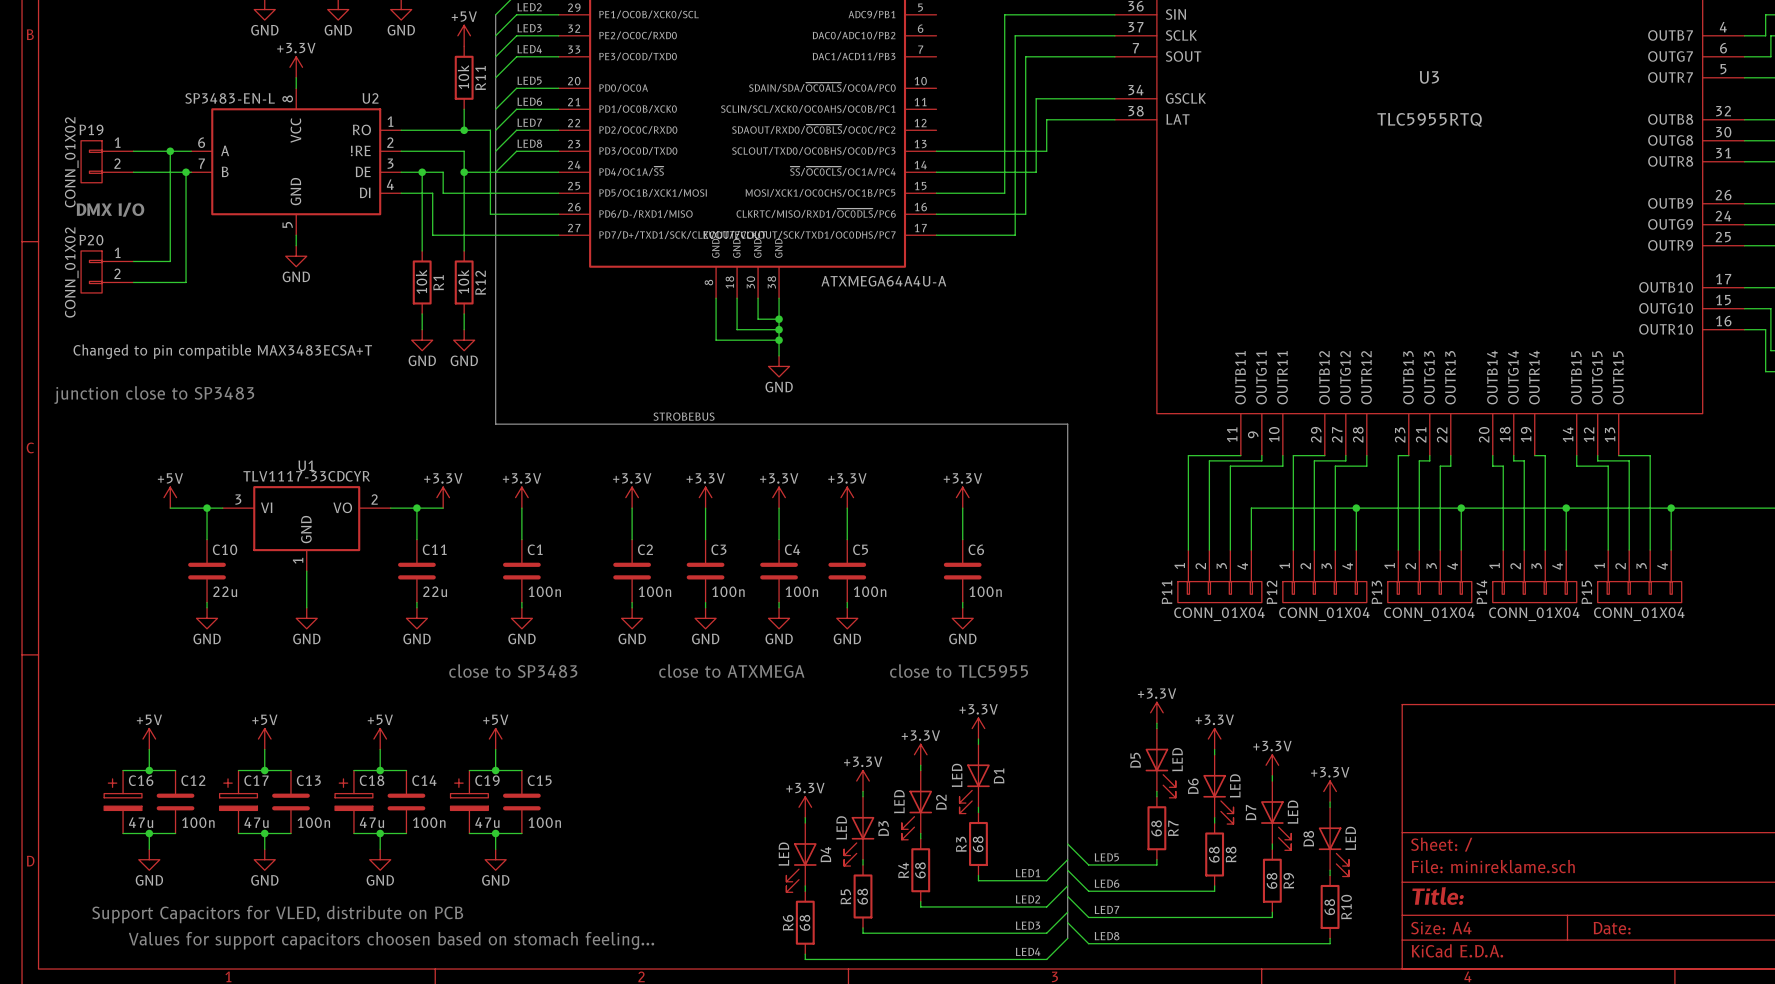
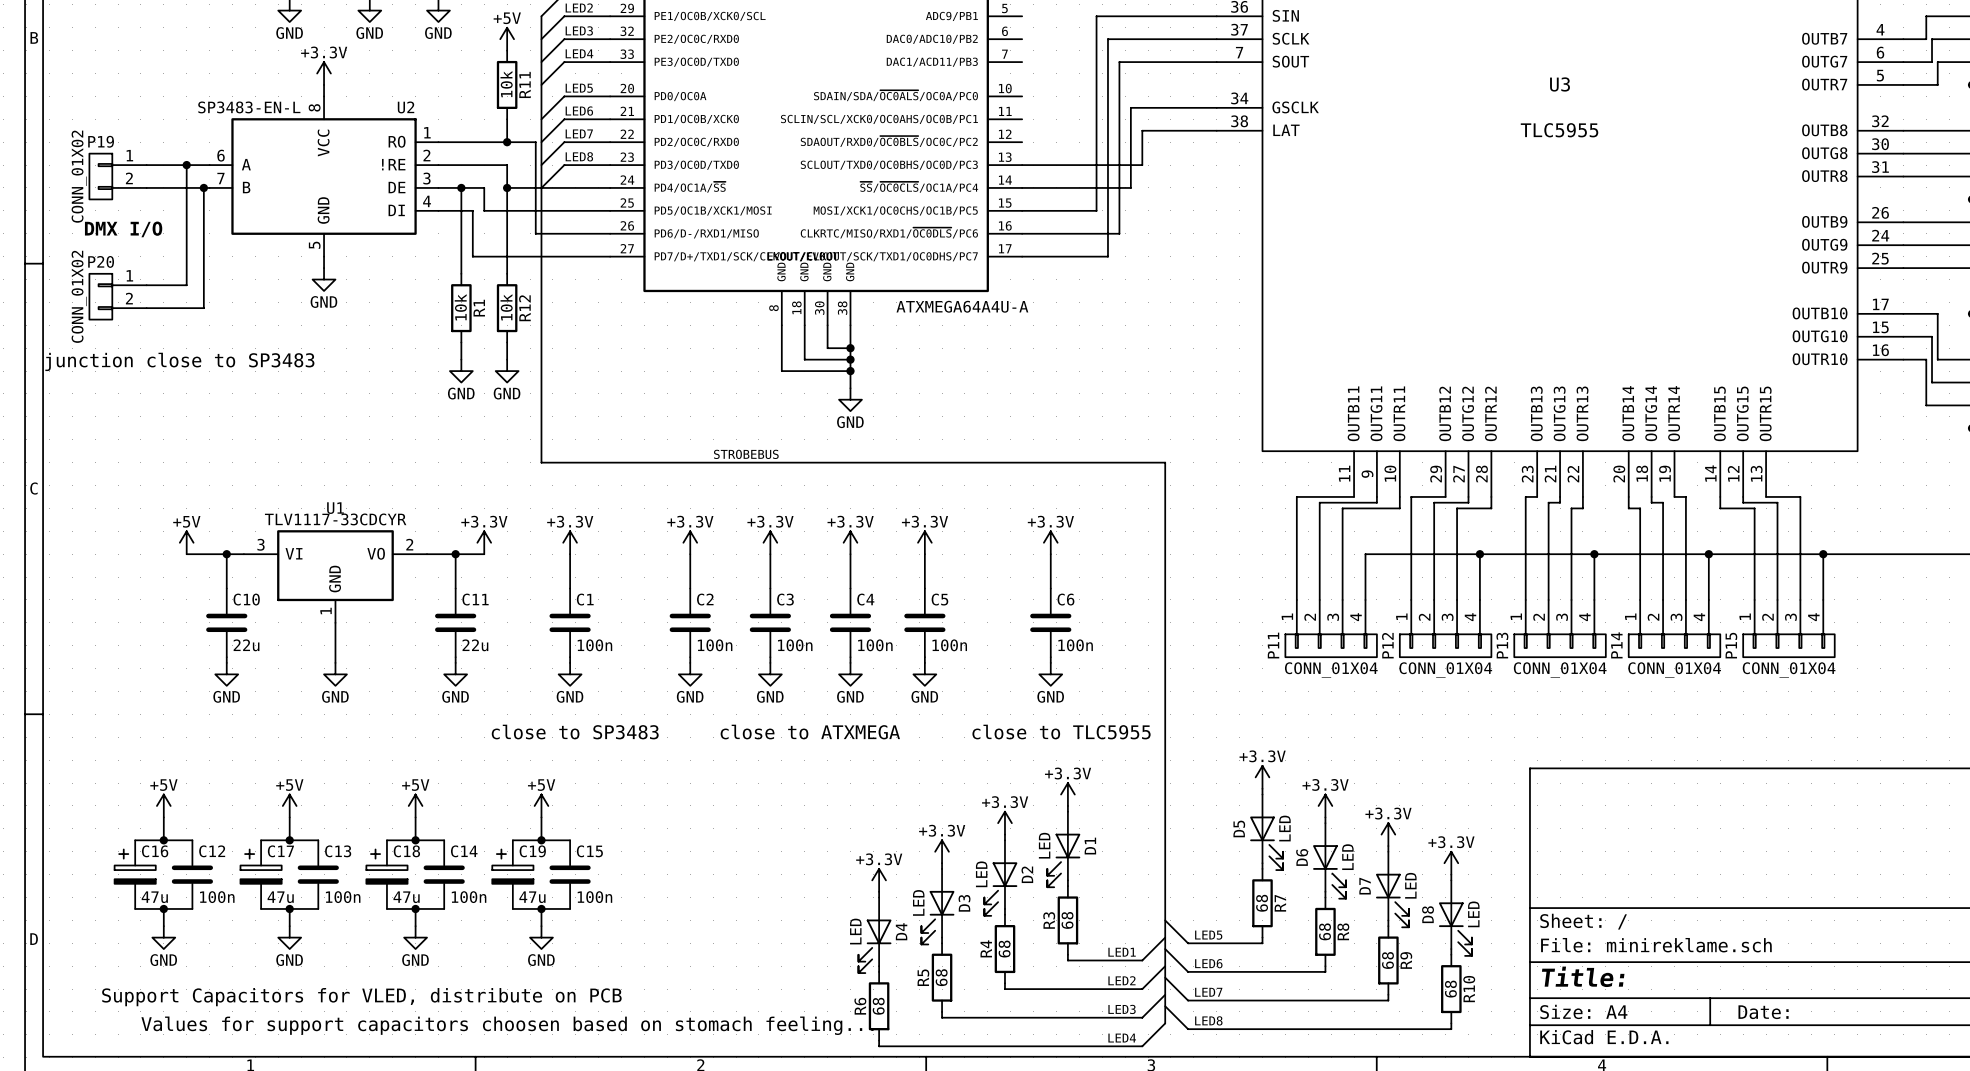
U3 value: TLC5955RTQ (1429, 119) -> TLC5955 (1559, 130)
U2 text: Changed to pin compatible MAX3483ECSA+T (222, 351) -> none
text position: junction close to SP3483 (154, 394) -> junction close to SP3483 (179, 361)

